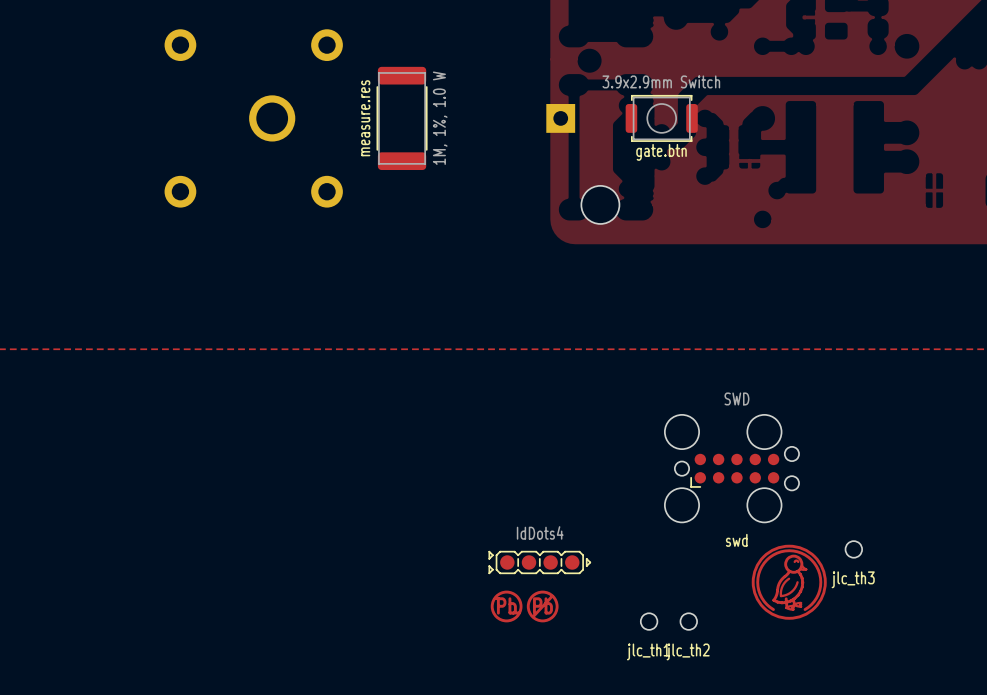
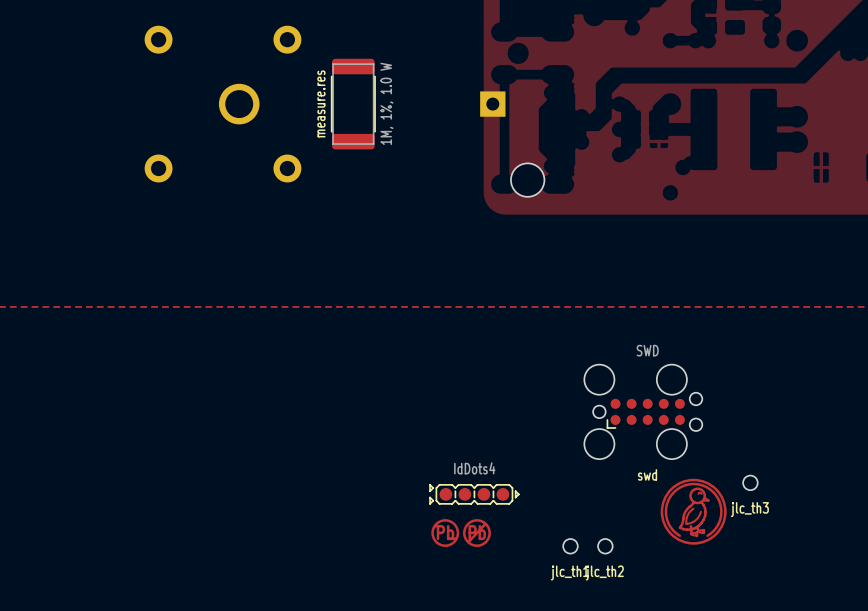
gate.btn: 3.9x2.9mm Switch (661, 118) -> none

